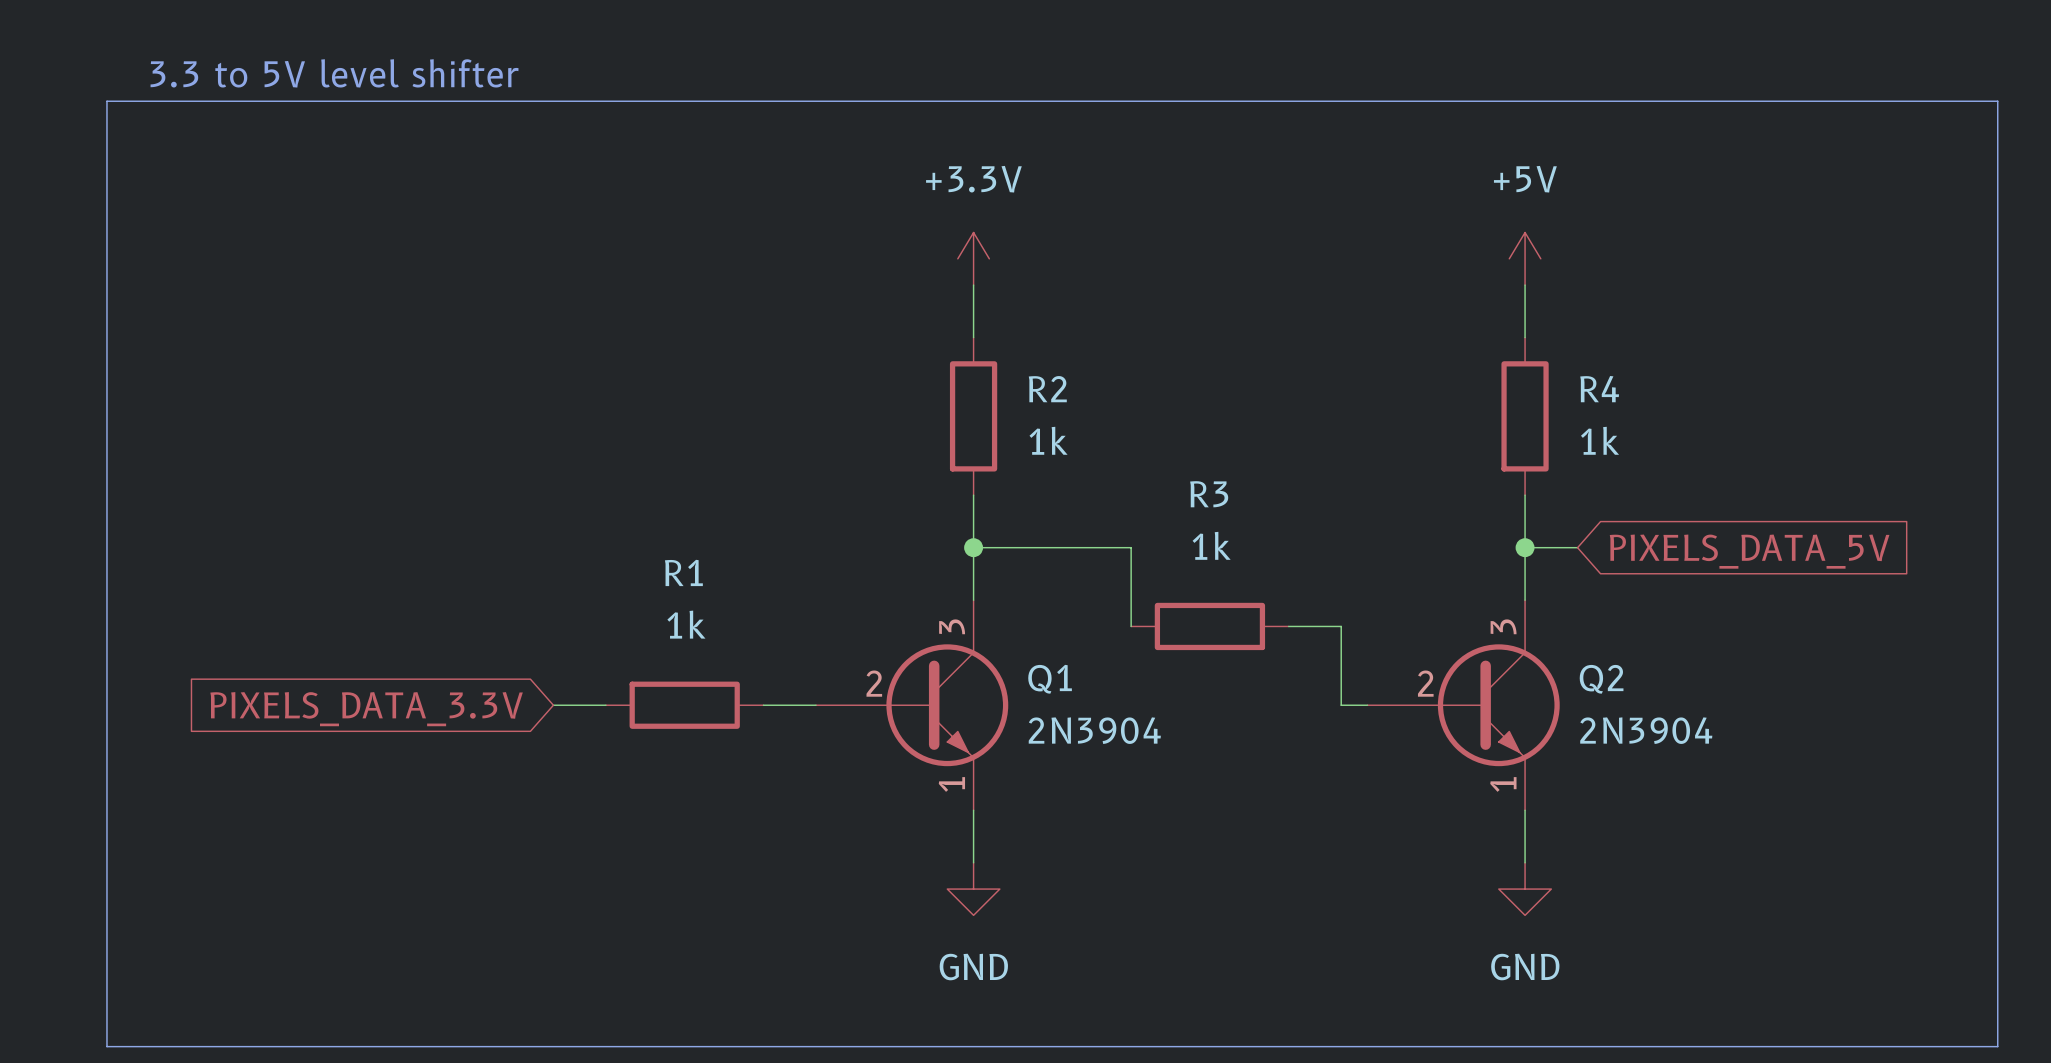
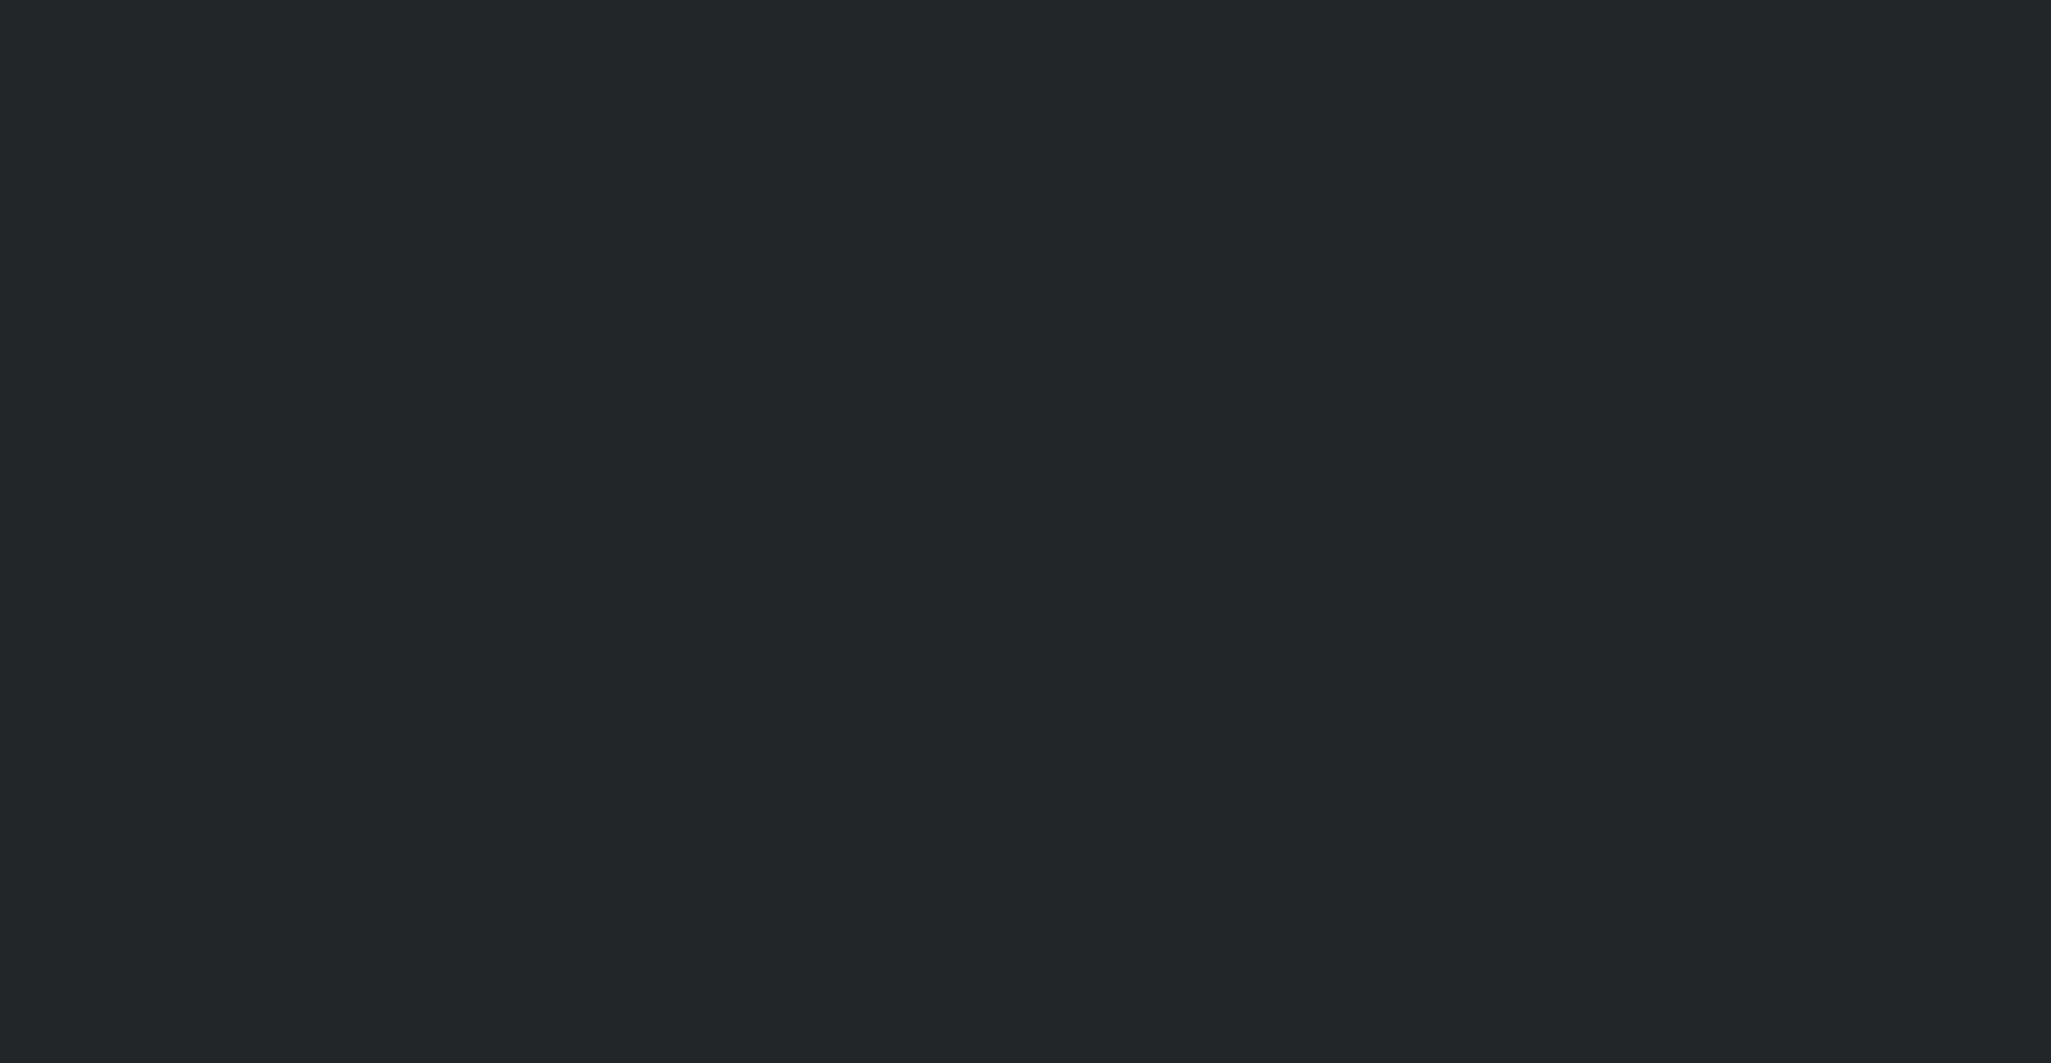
text: 3.3 to 5V level shifter (334, 73) -> none
line: (106, 101) (1997, 101) (1997, 1046) (106, 1046) (106, 101) -> none
power symbol: +3.3V (973, 258) -> none
power symbol: +5V (1525, 258) -> none
wire: (973, 285) (973, 337) -> none
wire: (1525, 285) (1525, 337) -> none
R2: 1k (973, 416) -> none
R4: 1k (1525, 416) -> none
wire: (973, 495) (973, 600) -> none
wire: (1525, 495) (1525, 600) -> none
wire: (973, 547) (1131, 547) (1131, 626) -> none
junction: (973, 547) -> none
wire: (1525, 547) (1577, 547) -> none
junction: (1525, 547) -> none
global label: PIXELS_DATA_5V (1749, 551) -> none
R3: 1k (1209, 626) -> none
wire: (1288, 626) (1341, 626) (1341, 705) (1367, 705) -> none
wire: (553, 705) (605, 705) -> none
R1: 1k (684, 705) -> none
wire: (763, 705) (816, 705) -> none
Q1: 2N3904 (912, 705) -> none
Q2: 2N3904 (1463, 705) -> none
global label: PIXELS_DATA_3.3V (366, 709) -> none
wire: (973, 810) (973, 862) -> none
wire: (1525, 810) (1525, 862) -> none
power symbol: GND (973, 889) -> none
power symbol: GND (1525, 889) -> none

